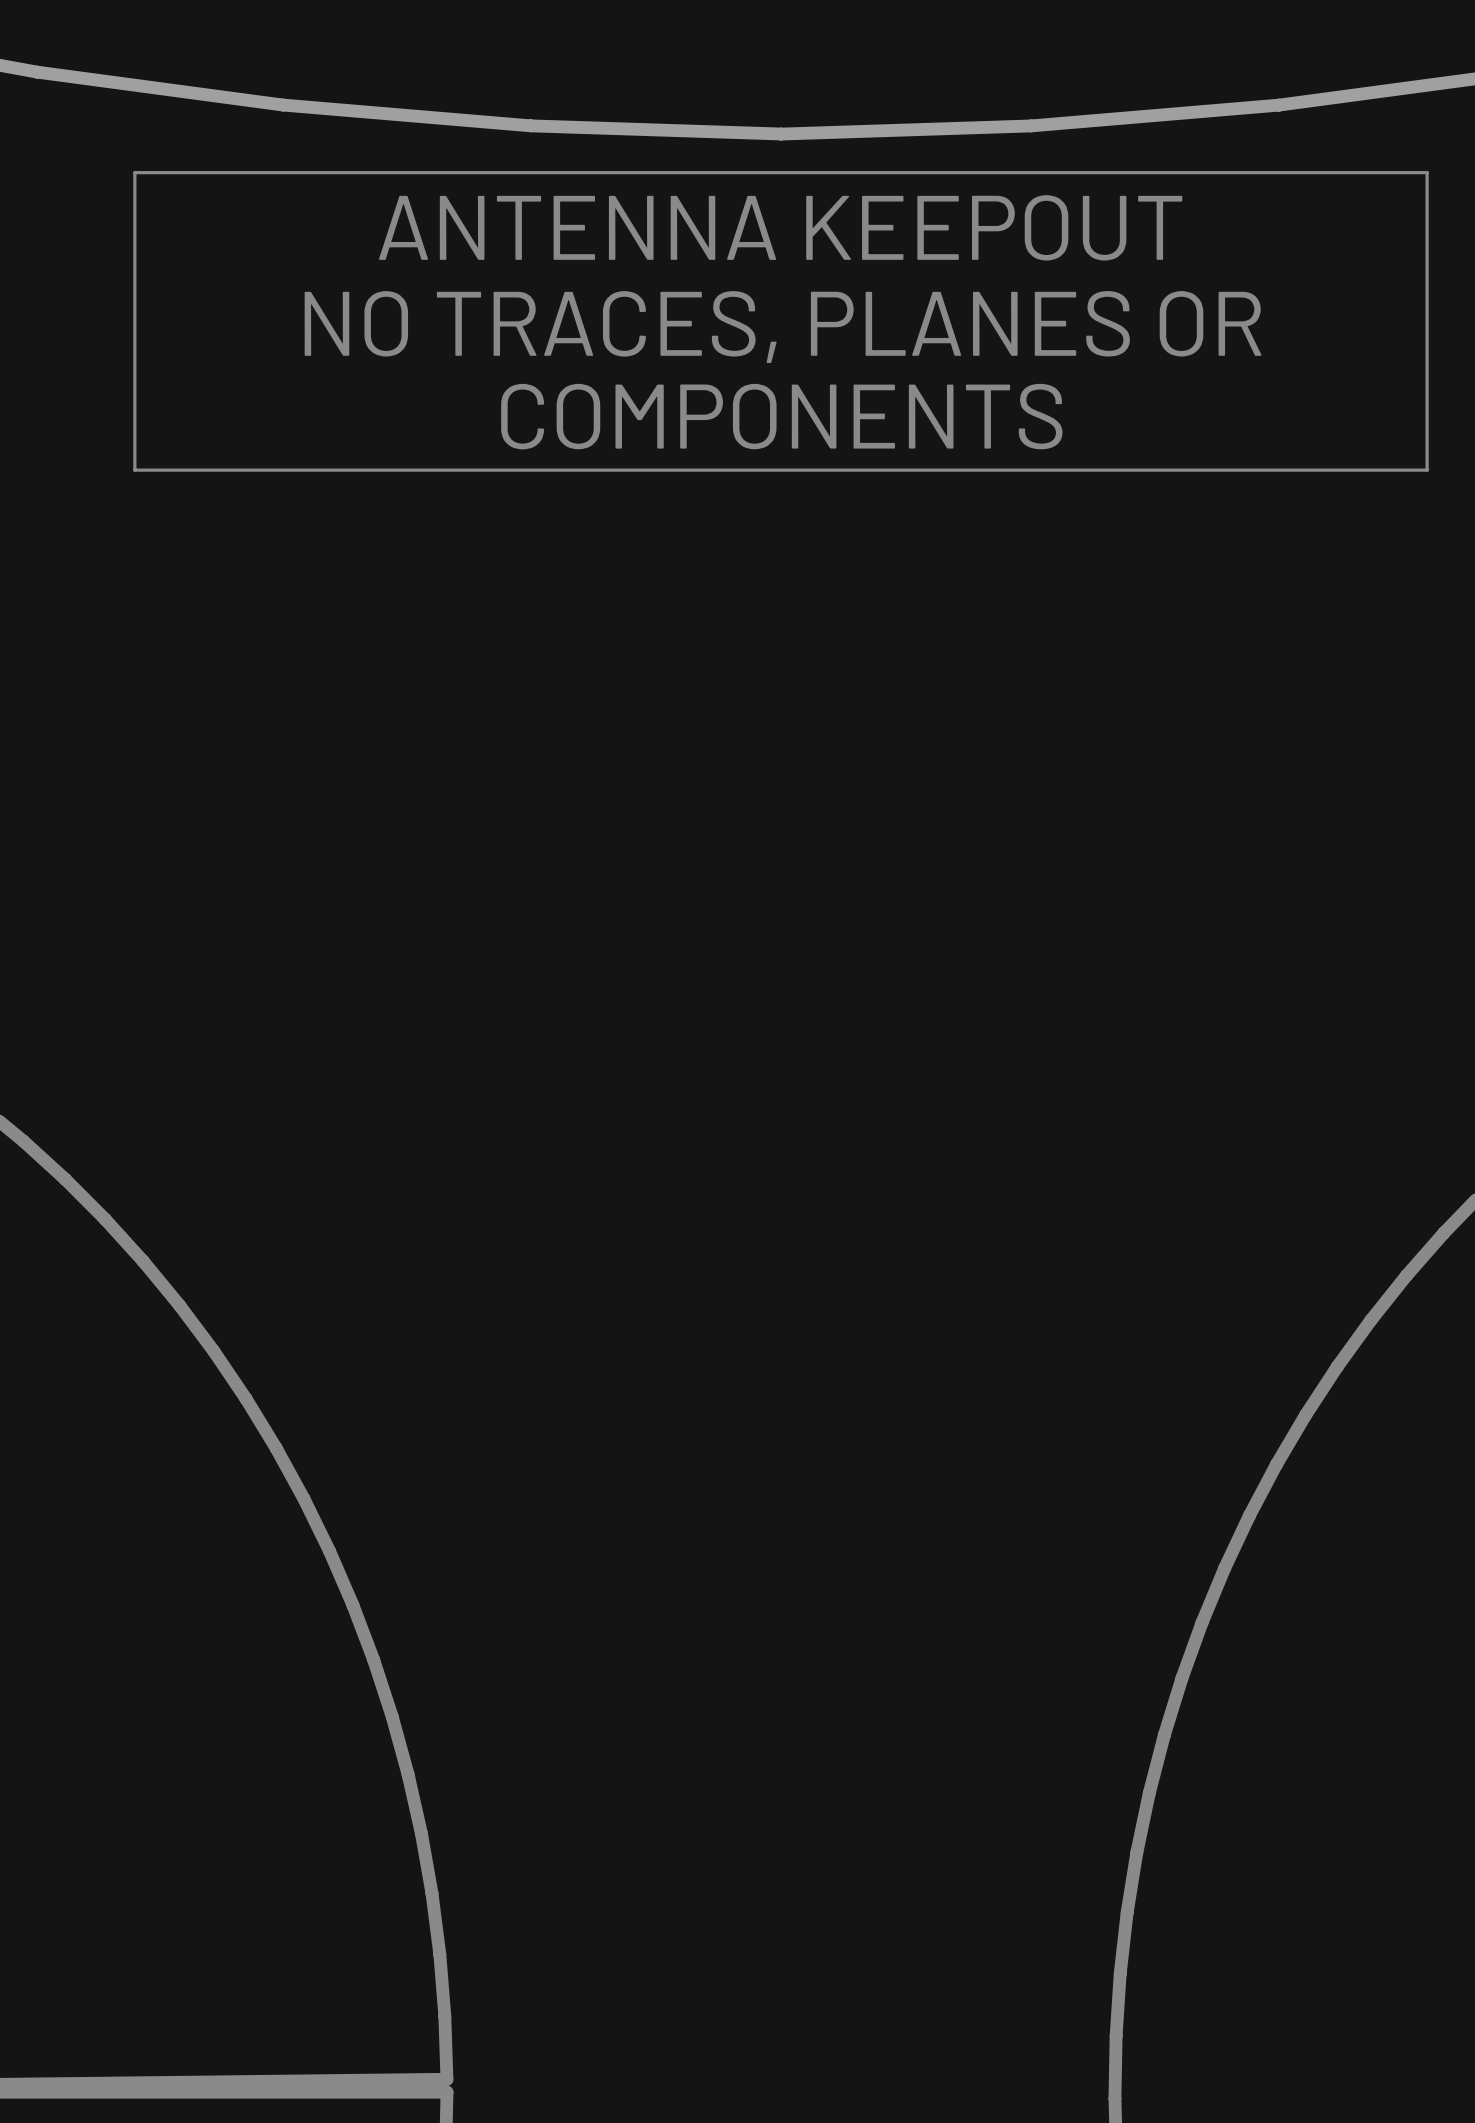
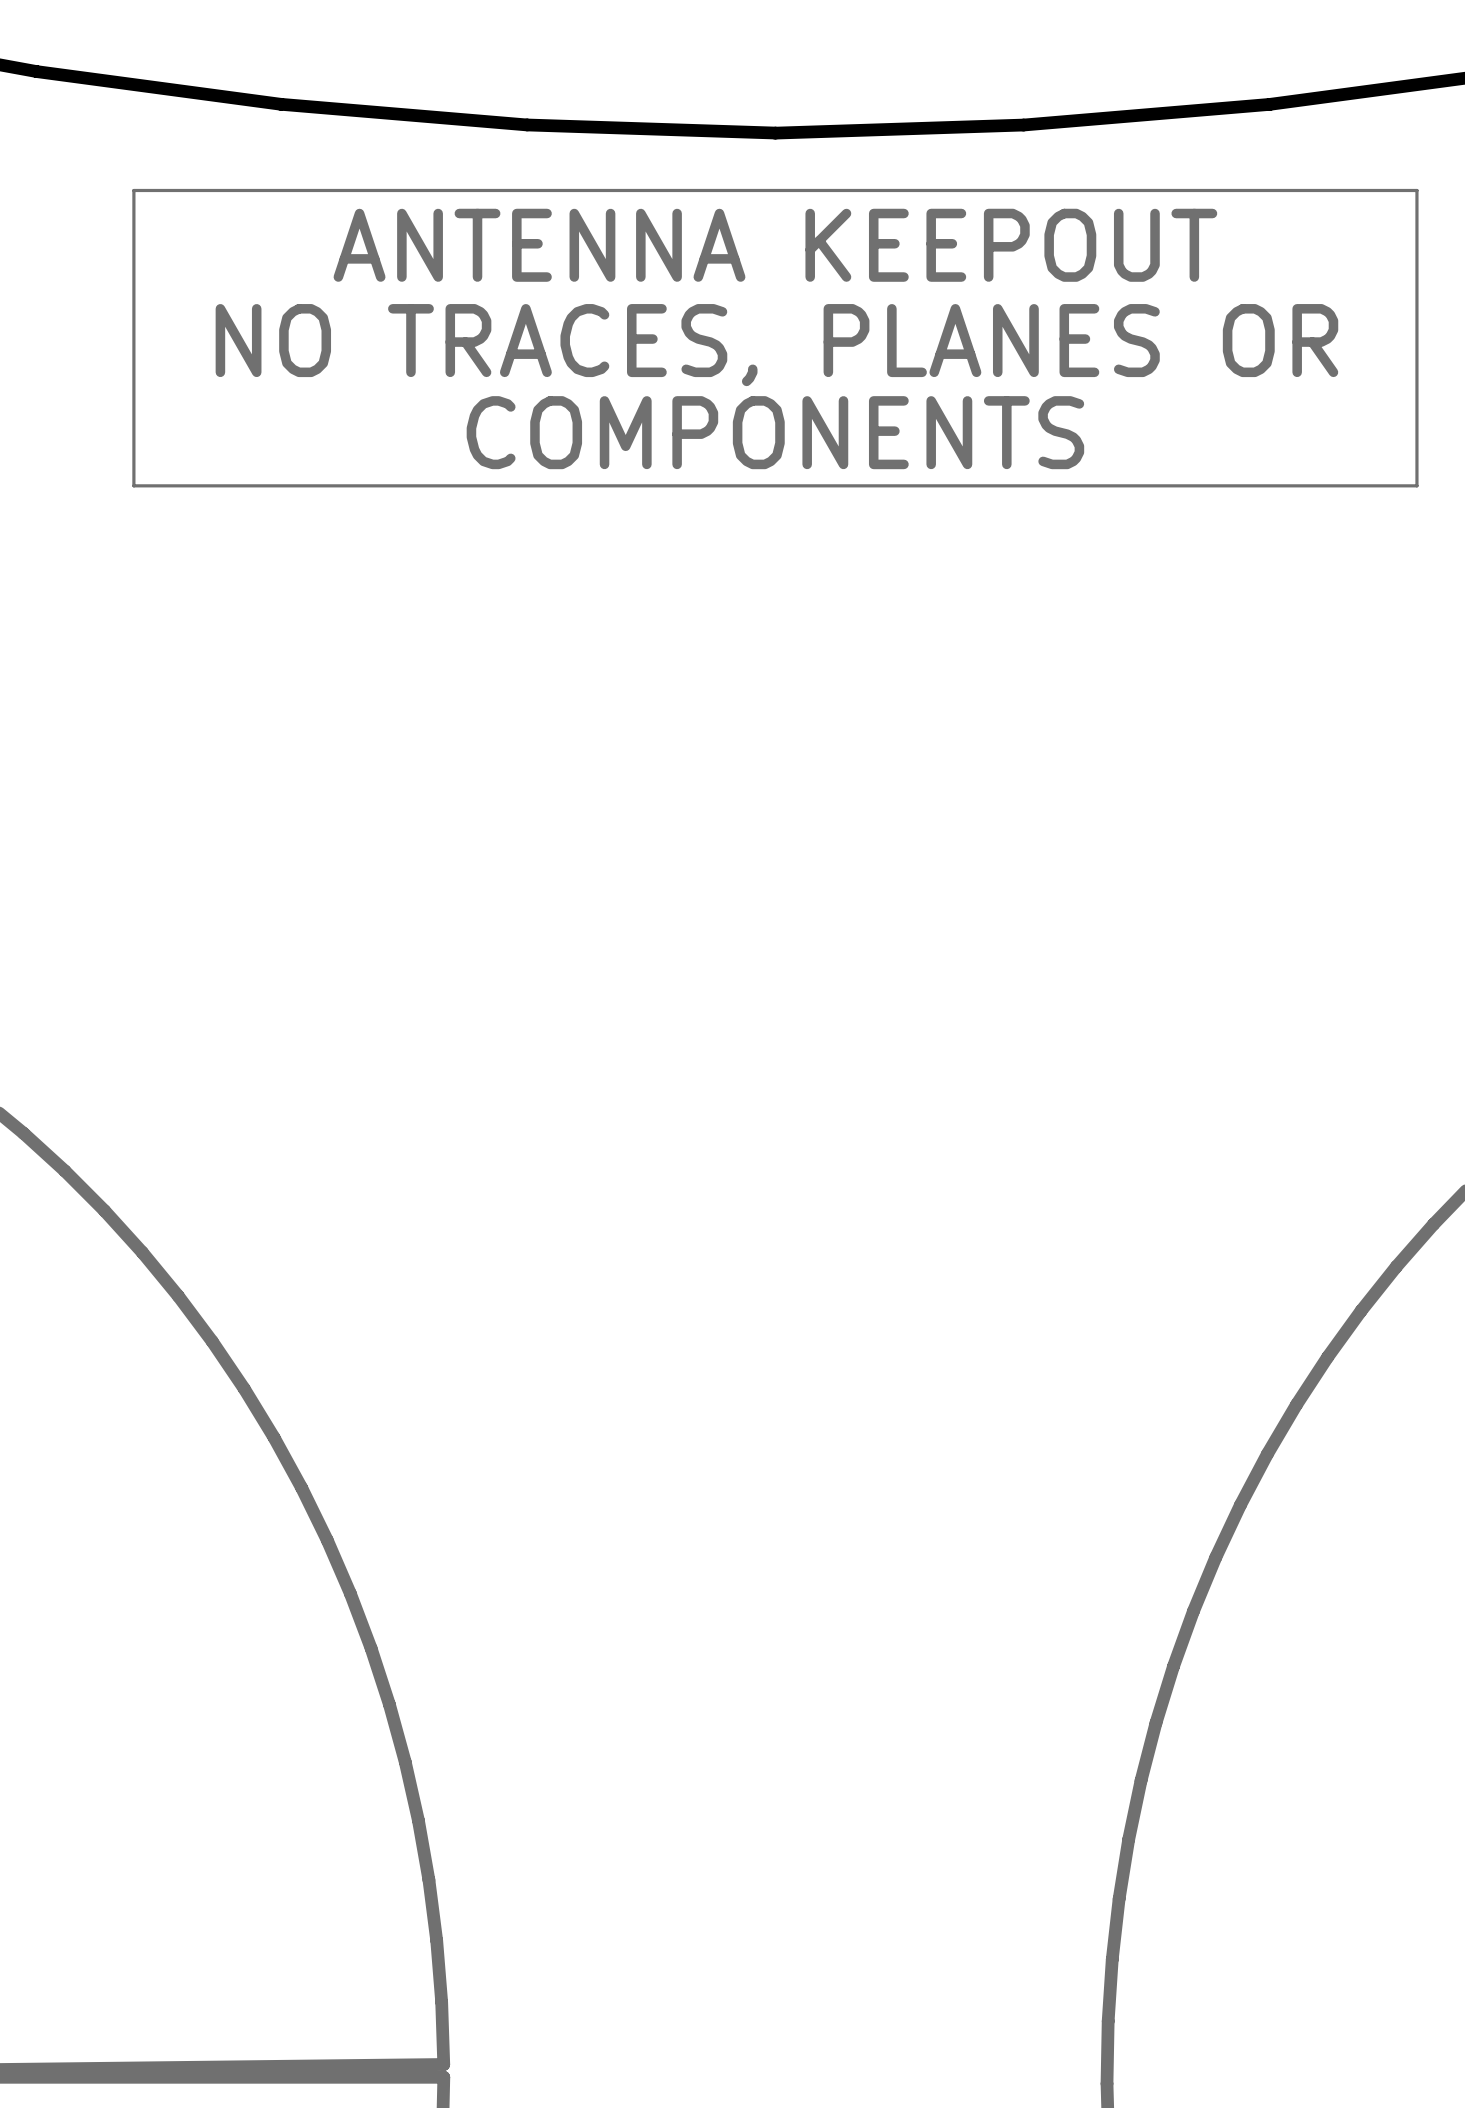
part position: (780, 321) -> (775, 338)

